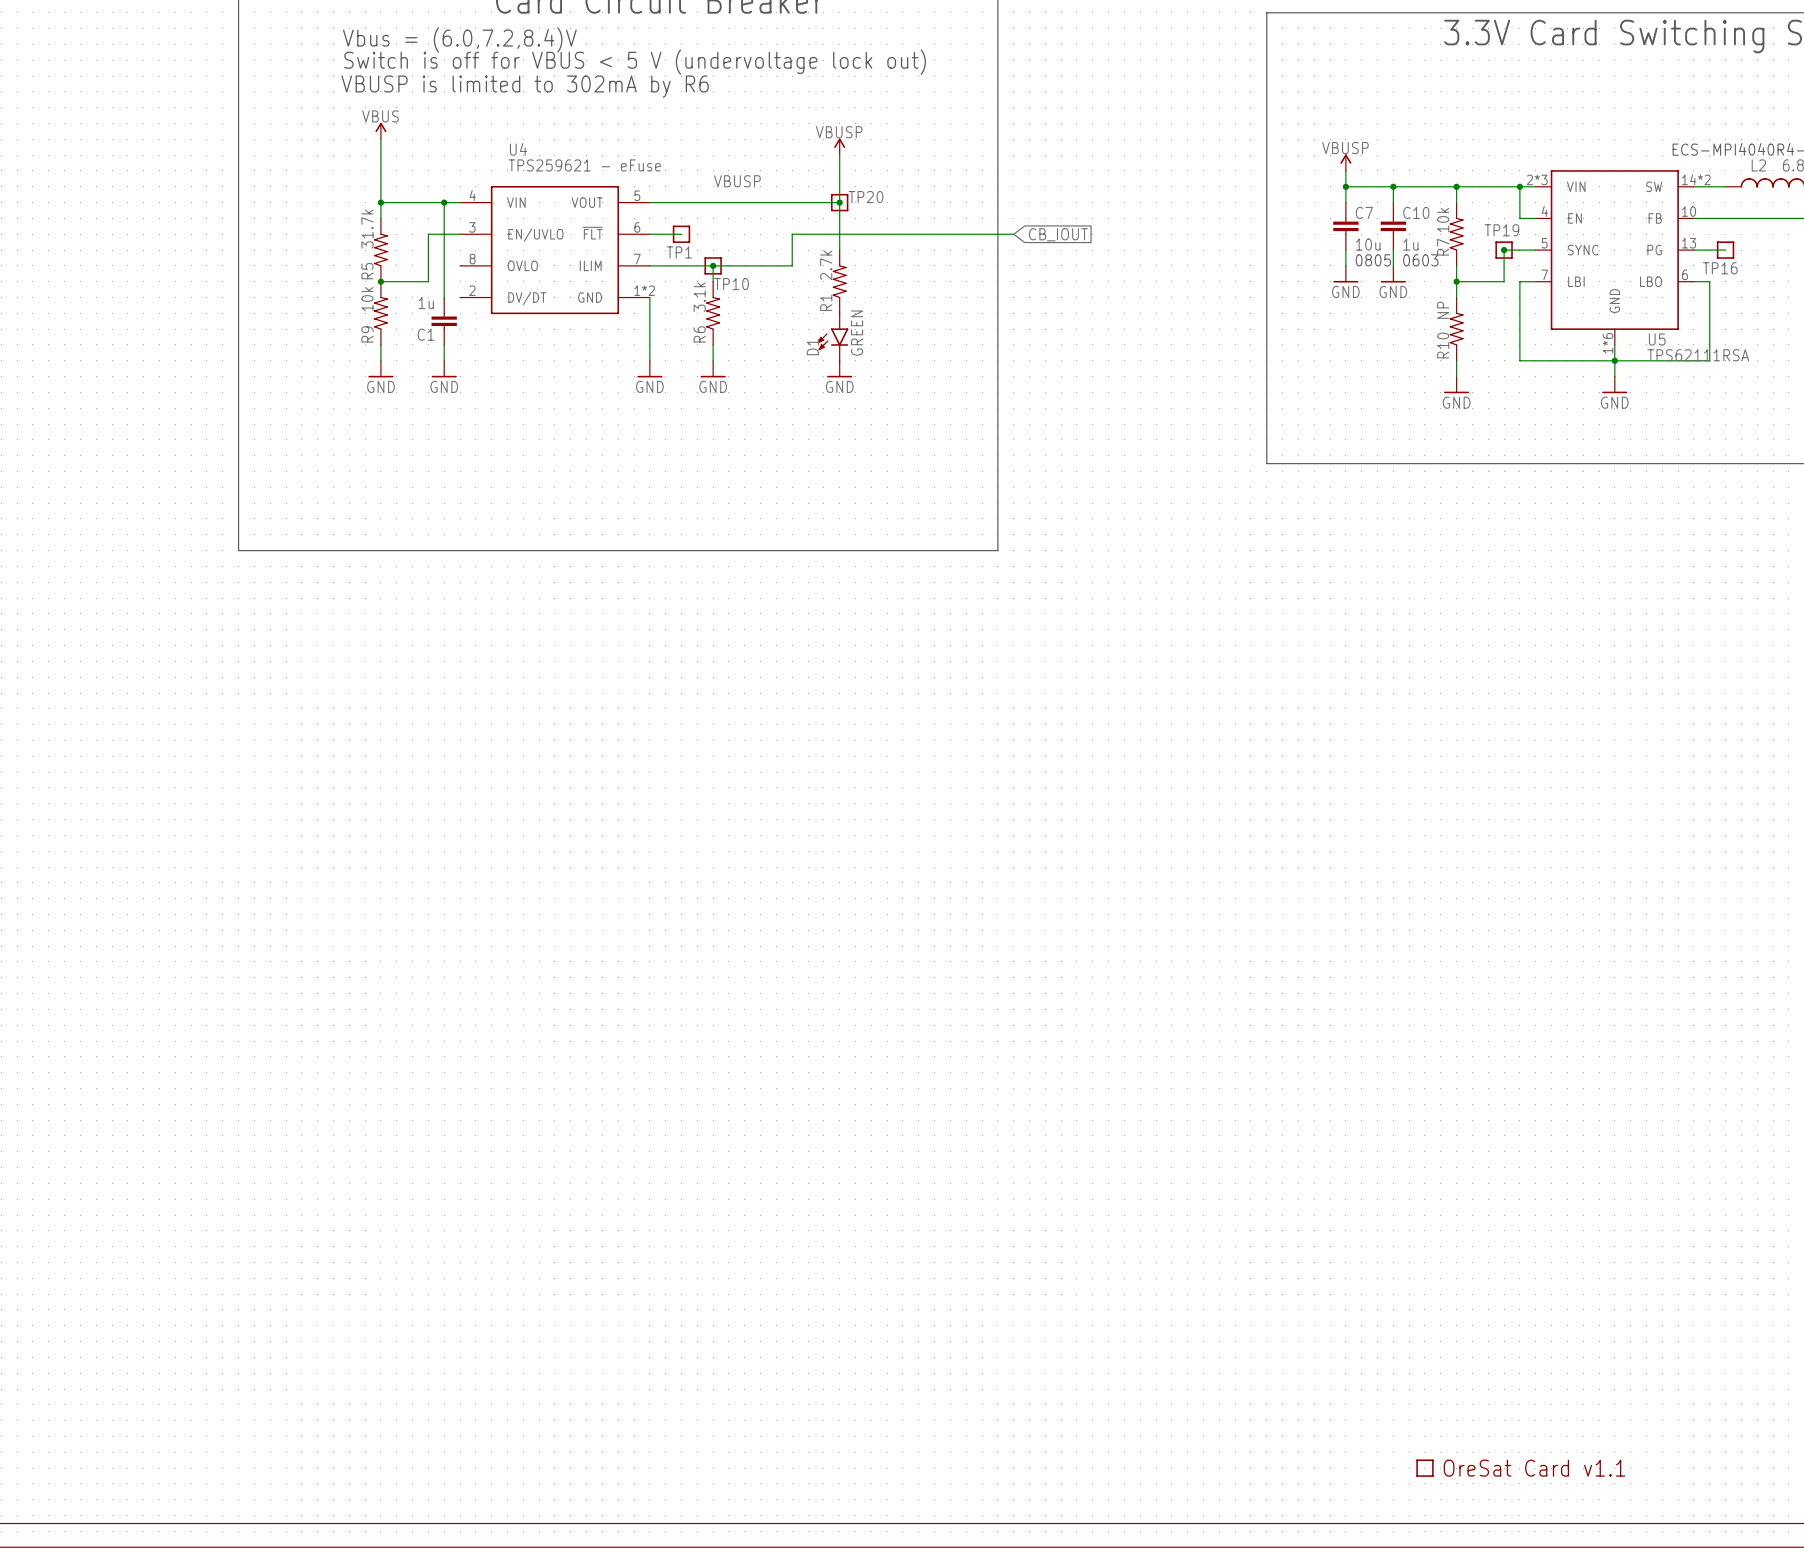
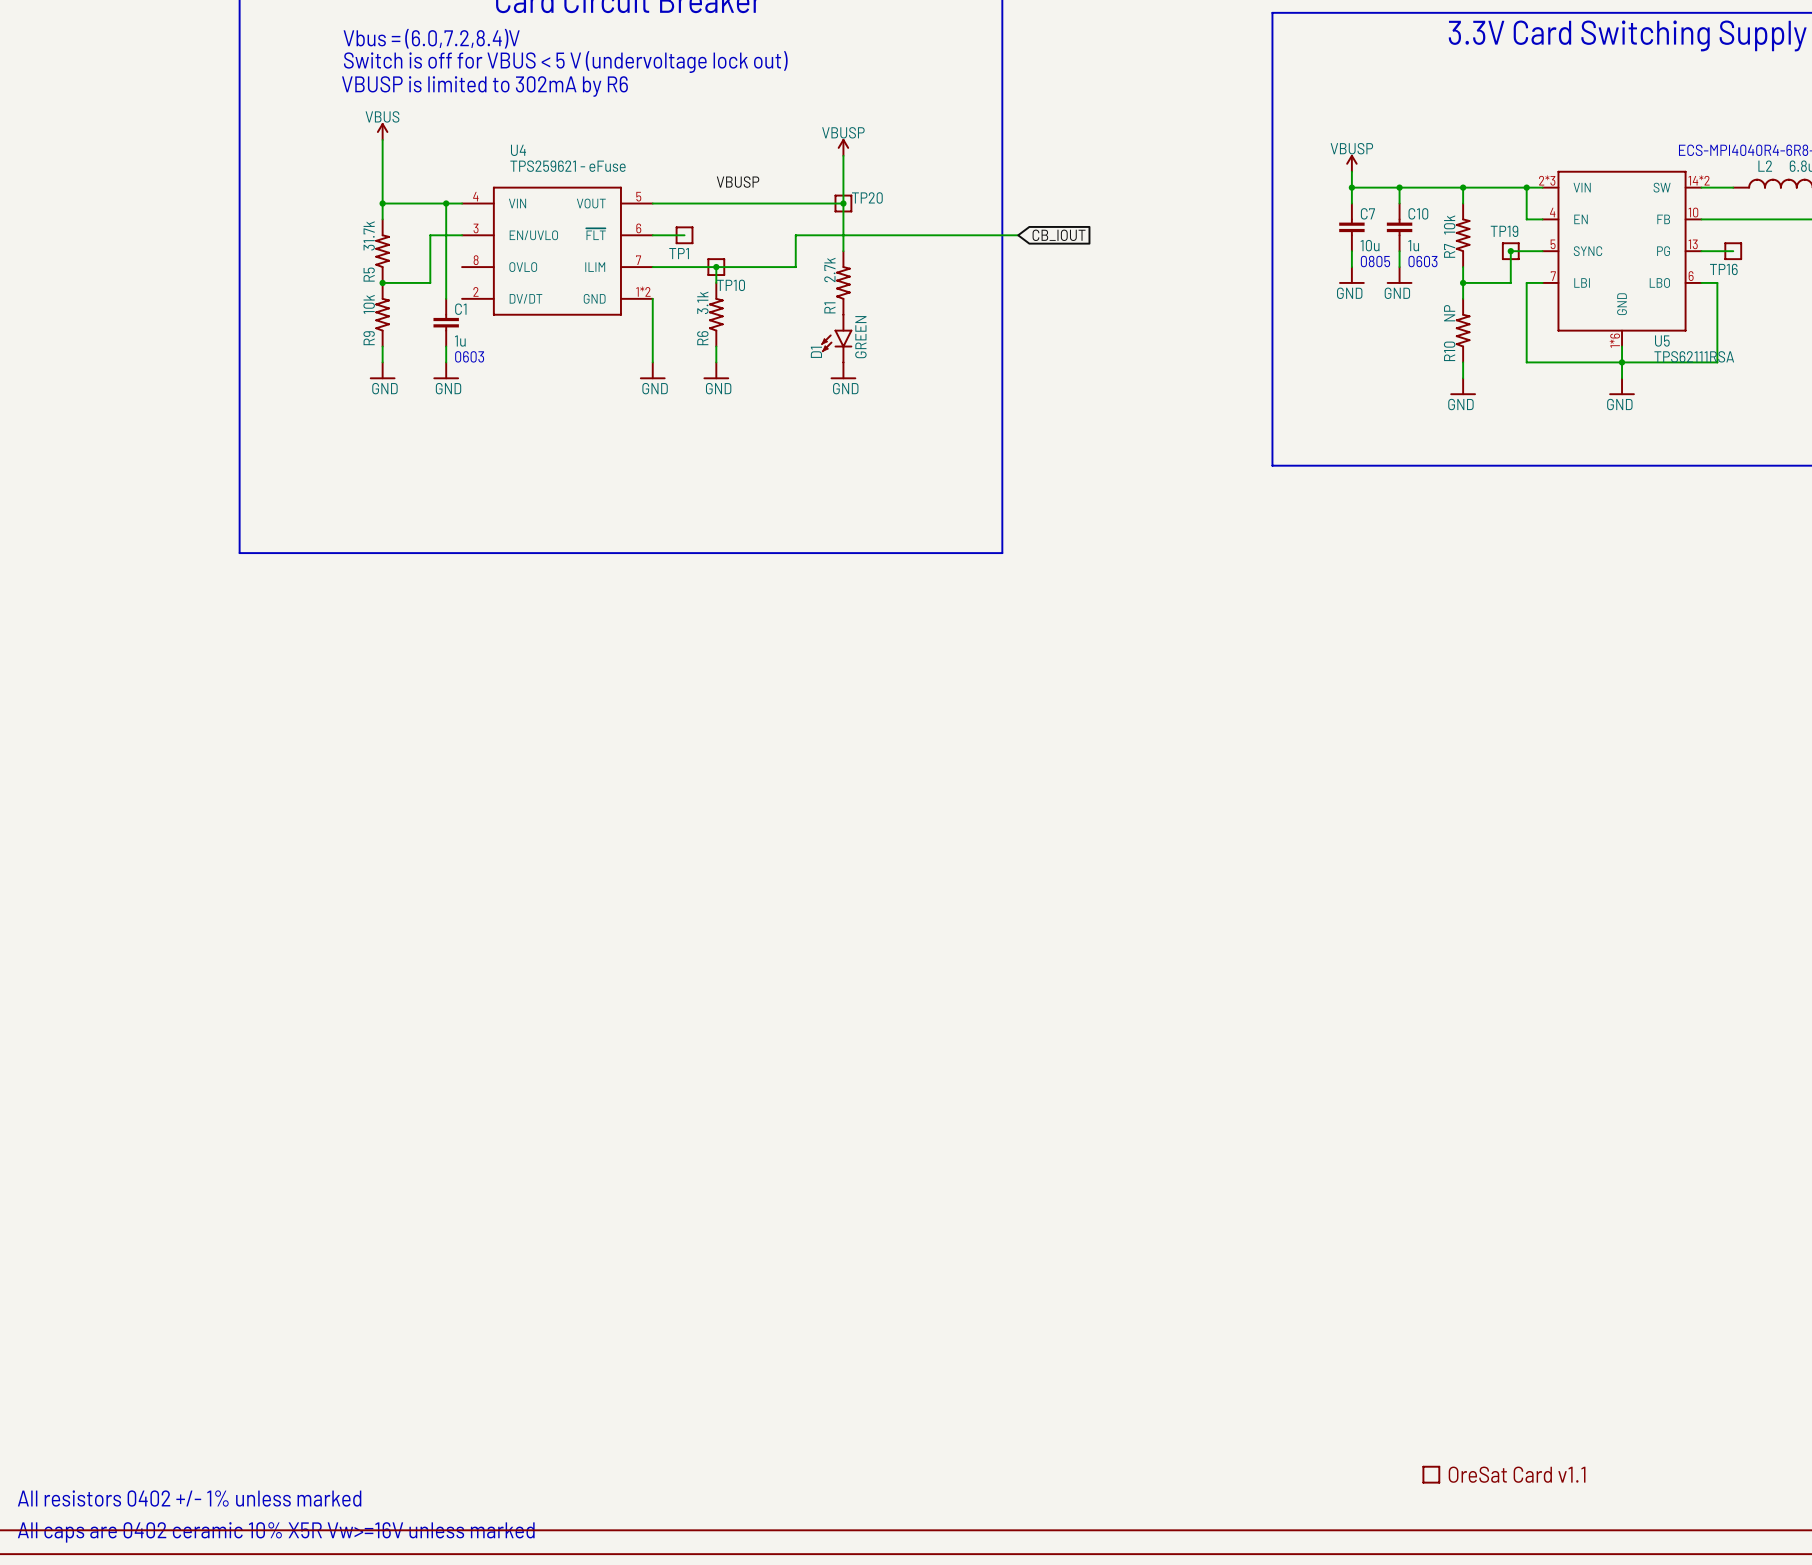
C1 value position: 1u (426, 303) -> 1u (460, 341)
C1 name position: C1 (425, 334) -> C1 (460, 309)
text: none -> 0603 (469, 356)
text: none -> All resistors 0402 +/- 1% unless marked (189, 1498)
text: none -> All caps are 0402 ceramic 10% X5R Vw>=16V unless marked (276, 1532)

